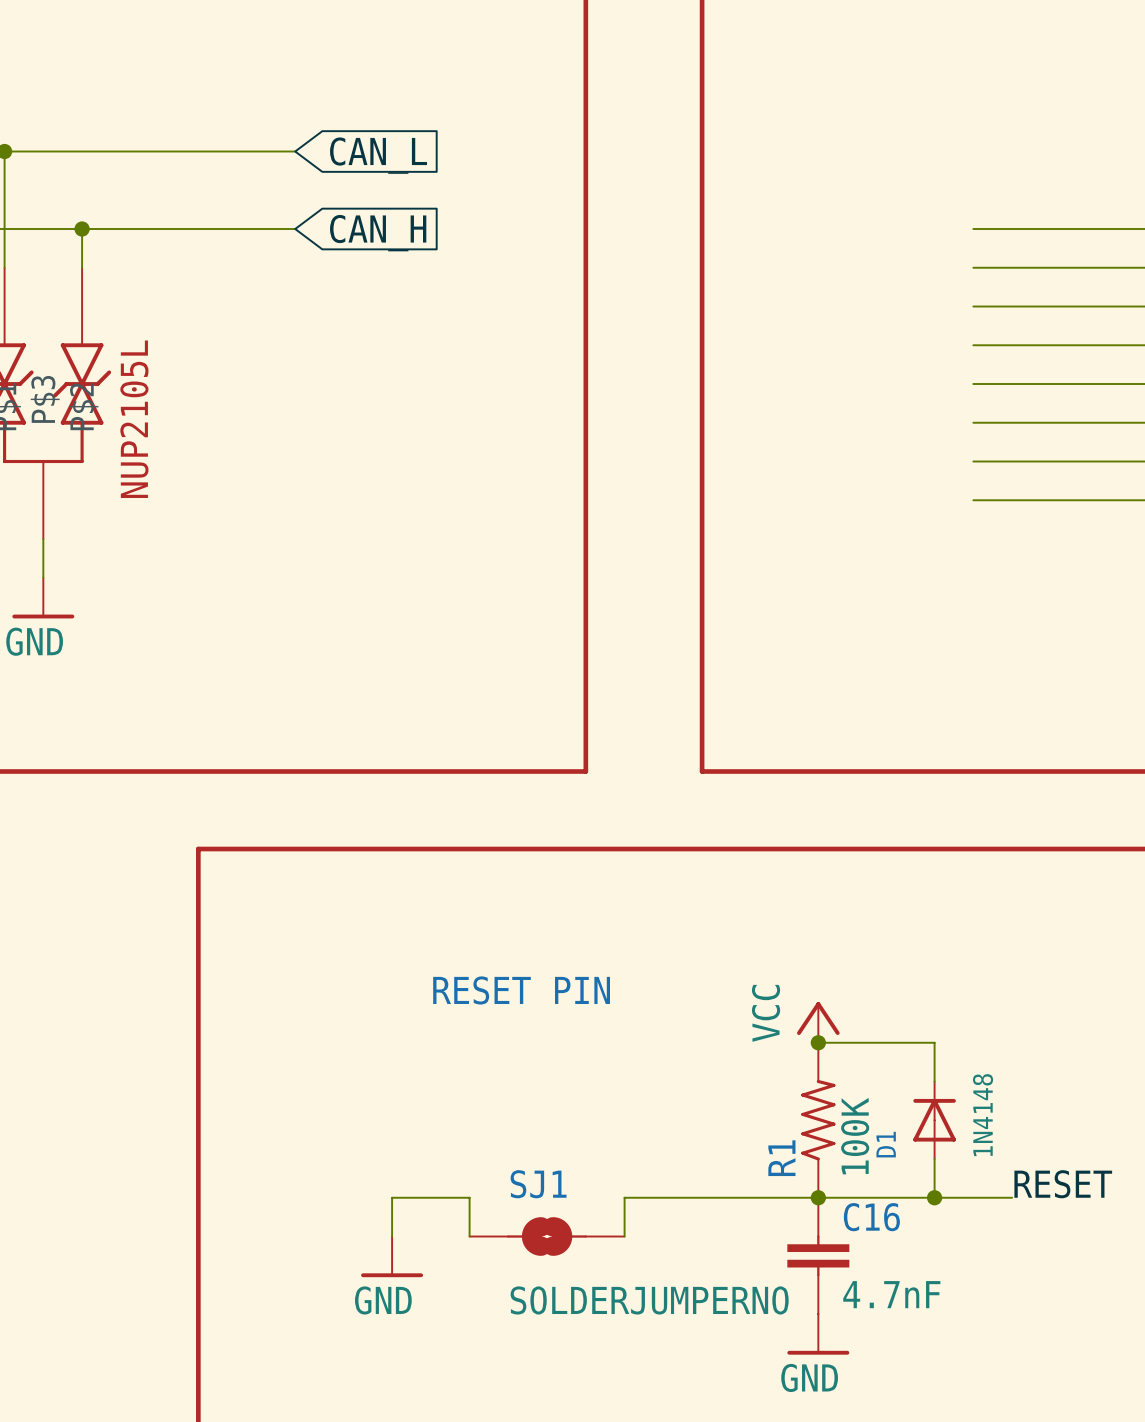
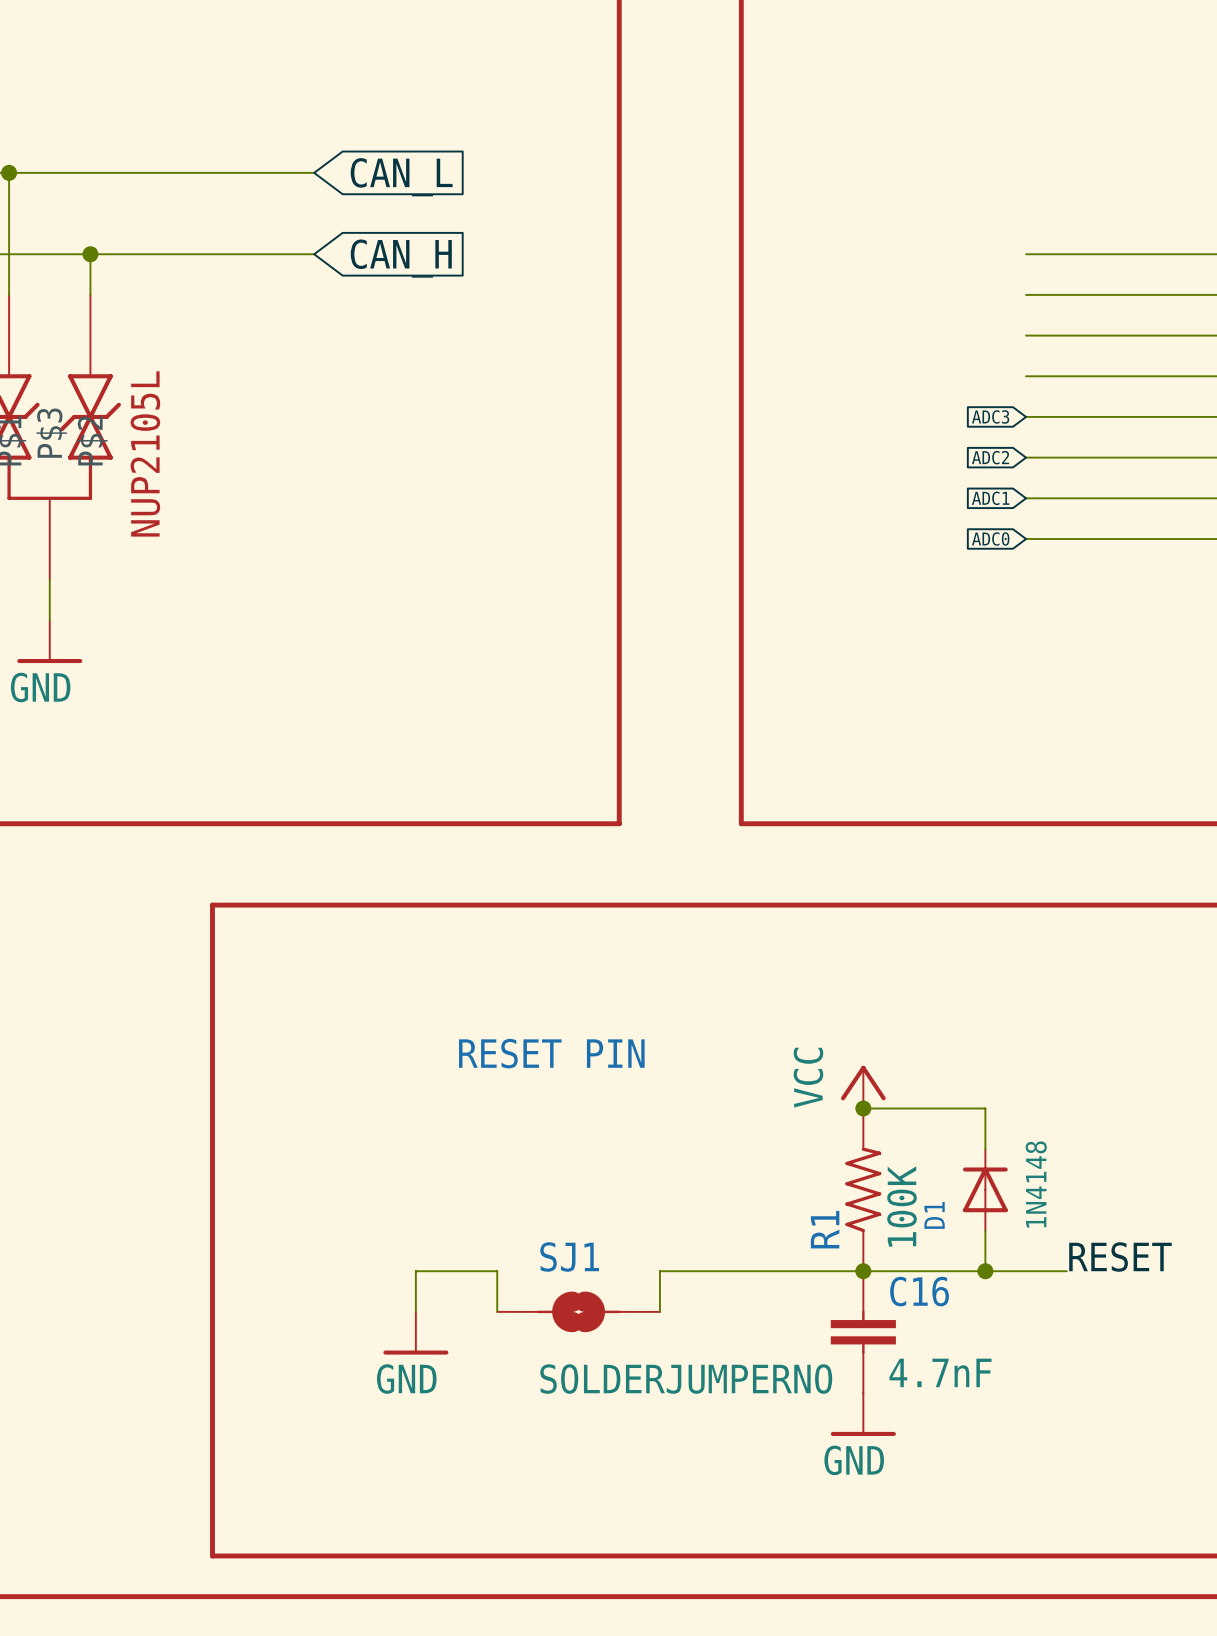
global label: none -> ADC3 (990, 416)
global label: none -> ADC2 (990, 457)
global label: none -> ADC1 (990, 498)
global label: none -> ADC0 (990, 539)

